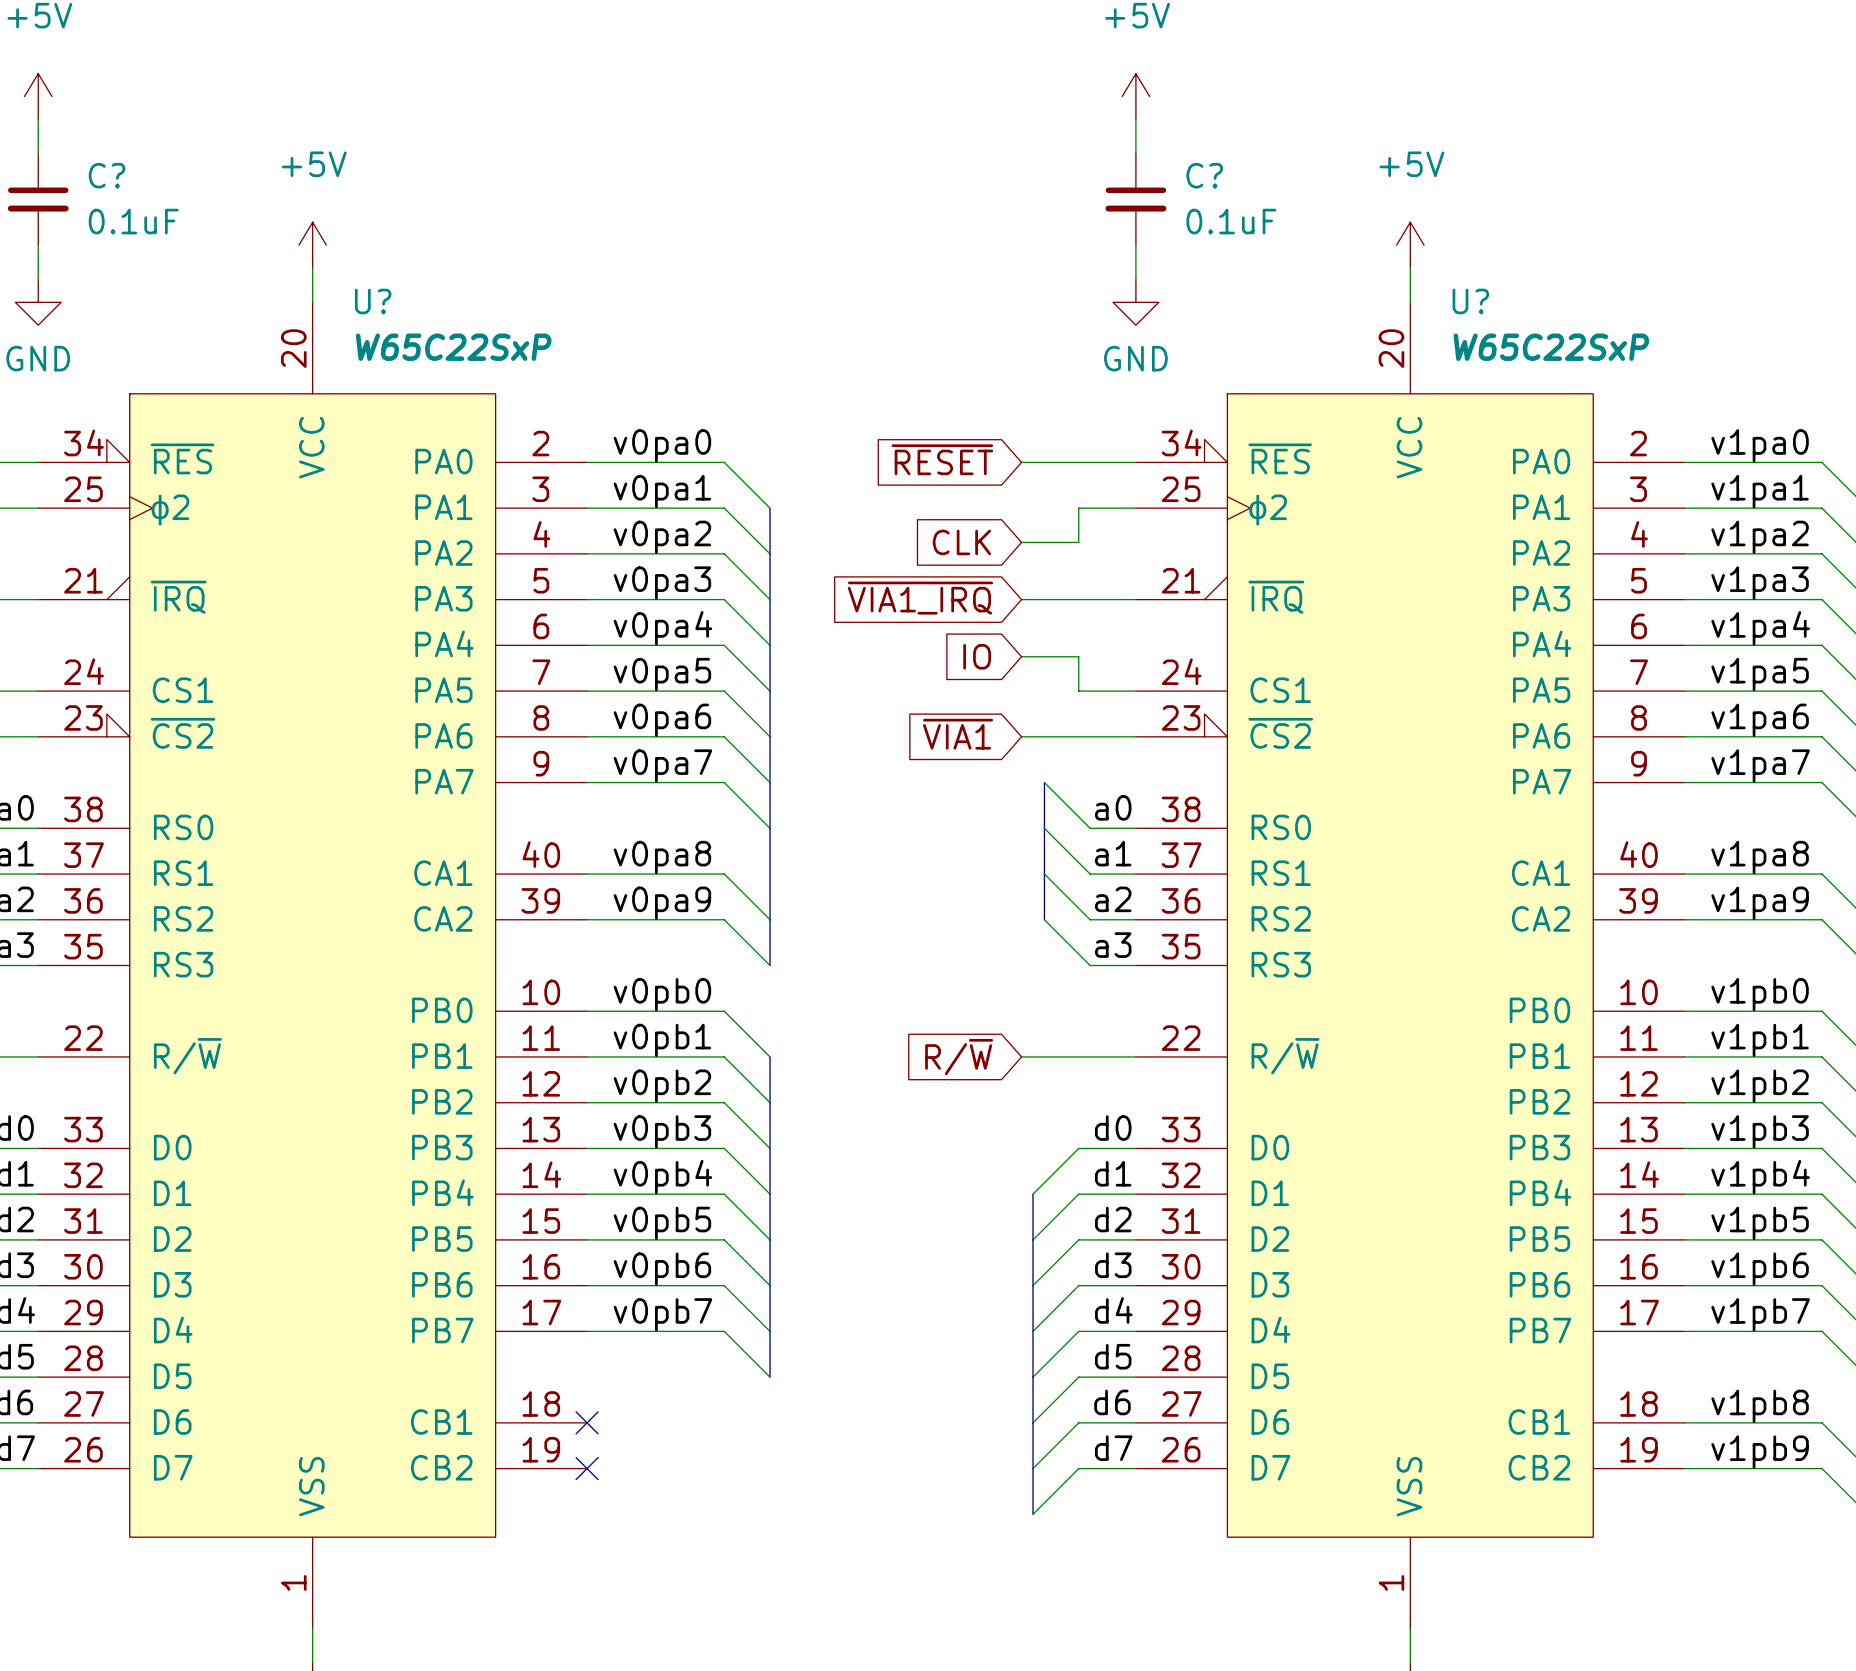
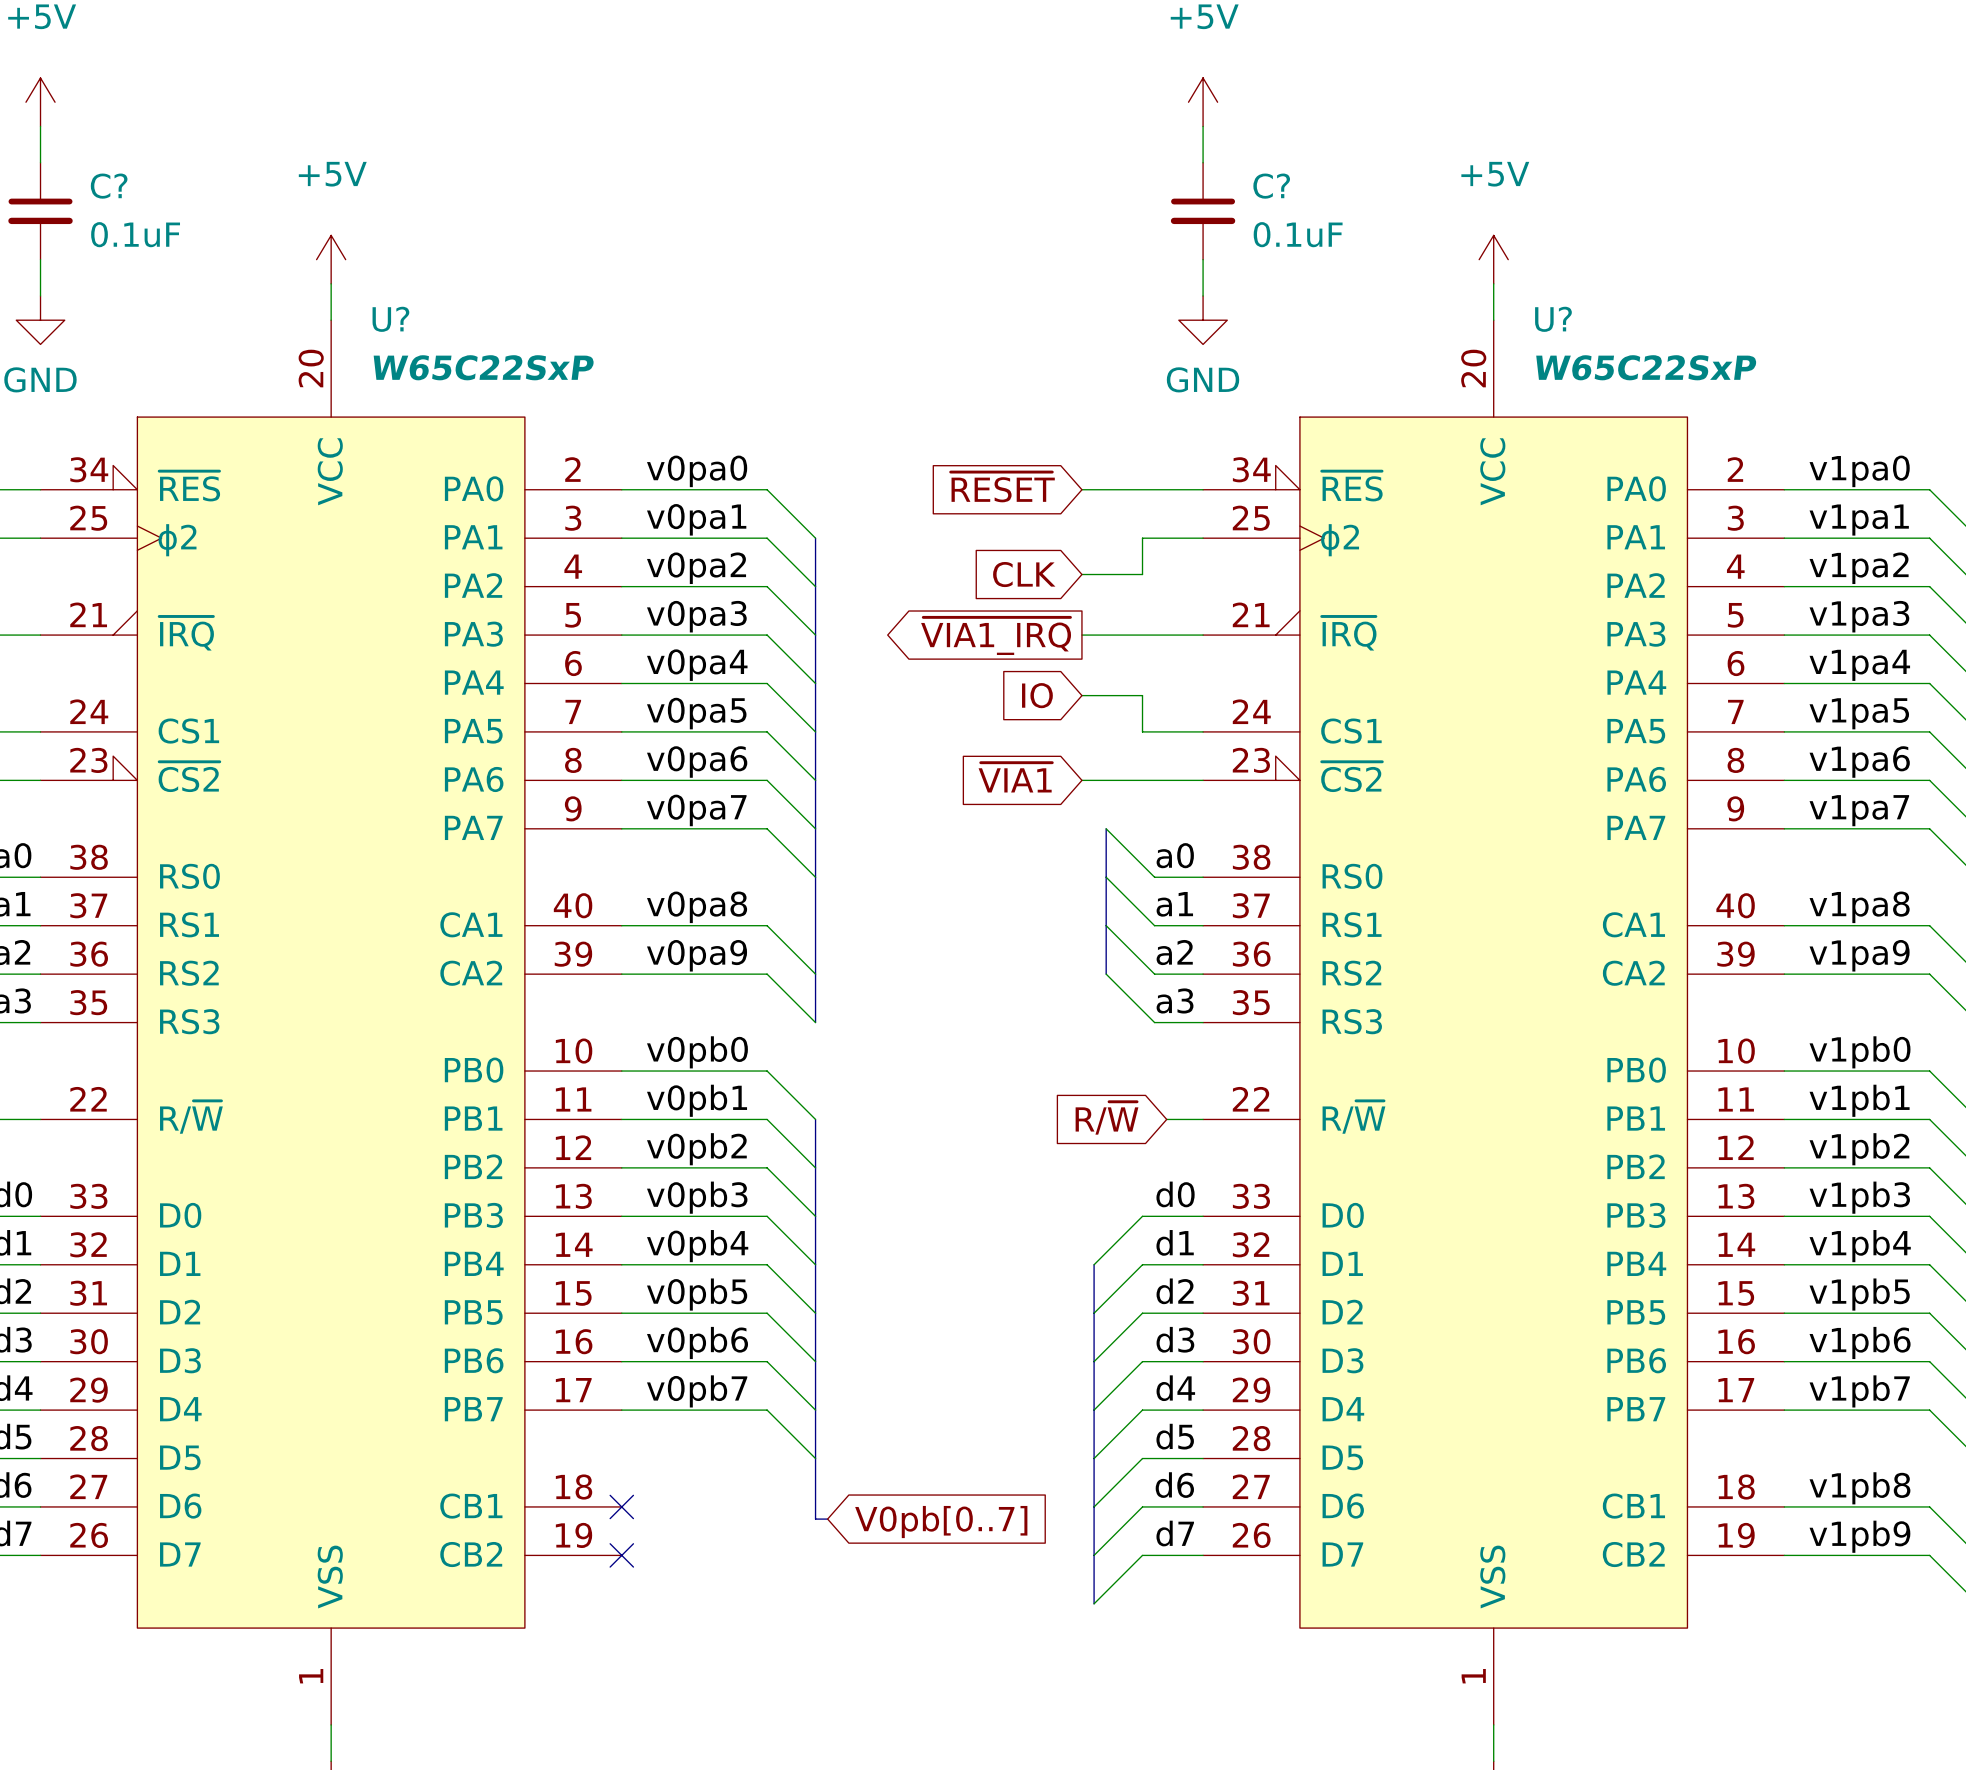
global label shape: input (920, 598) -> output (996, 636)
wire: (1021, 1056) (1101, 1056) -> none
global label position: R/~{W} (959, 1057) -> R/~{W} (1107, 1118)
bus: none -> (815, 1458) (815, 1519) (827, 1519)
global label: none -> V0pb[0..7] (941, 1522)

